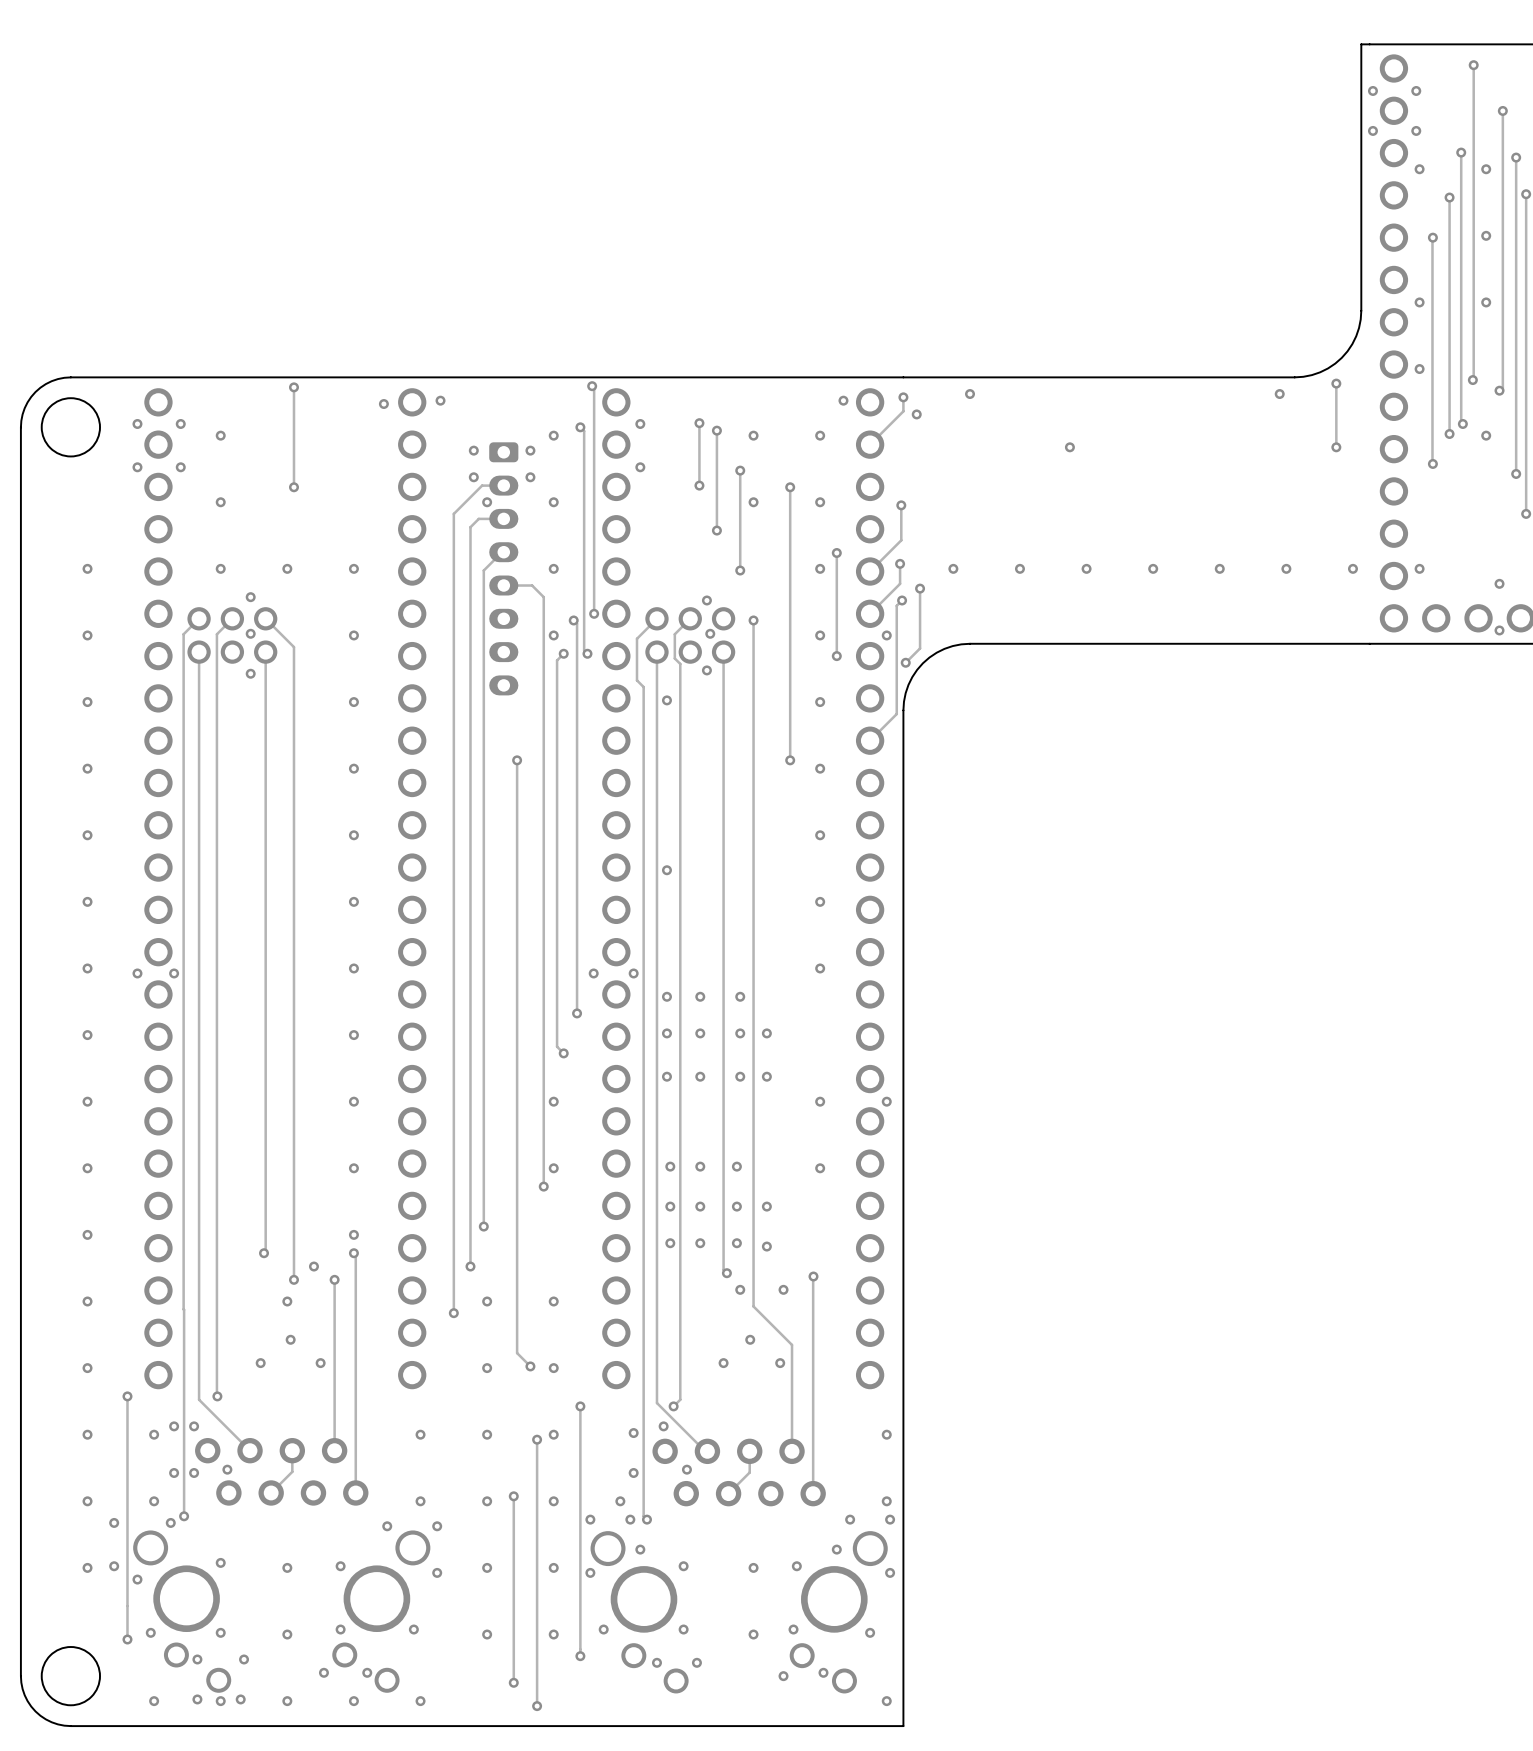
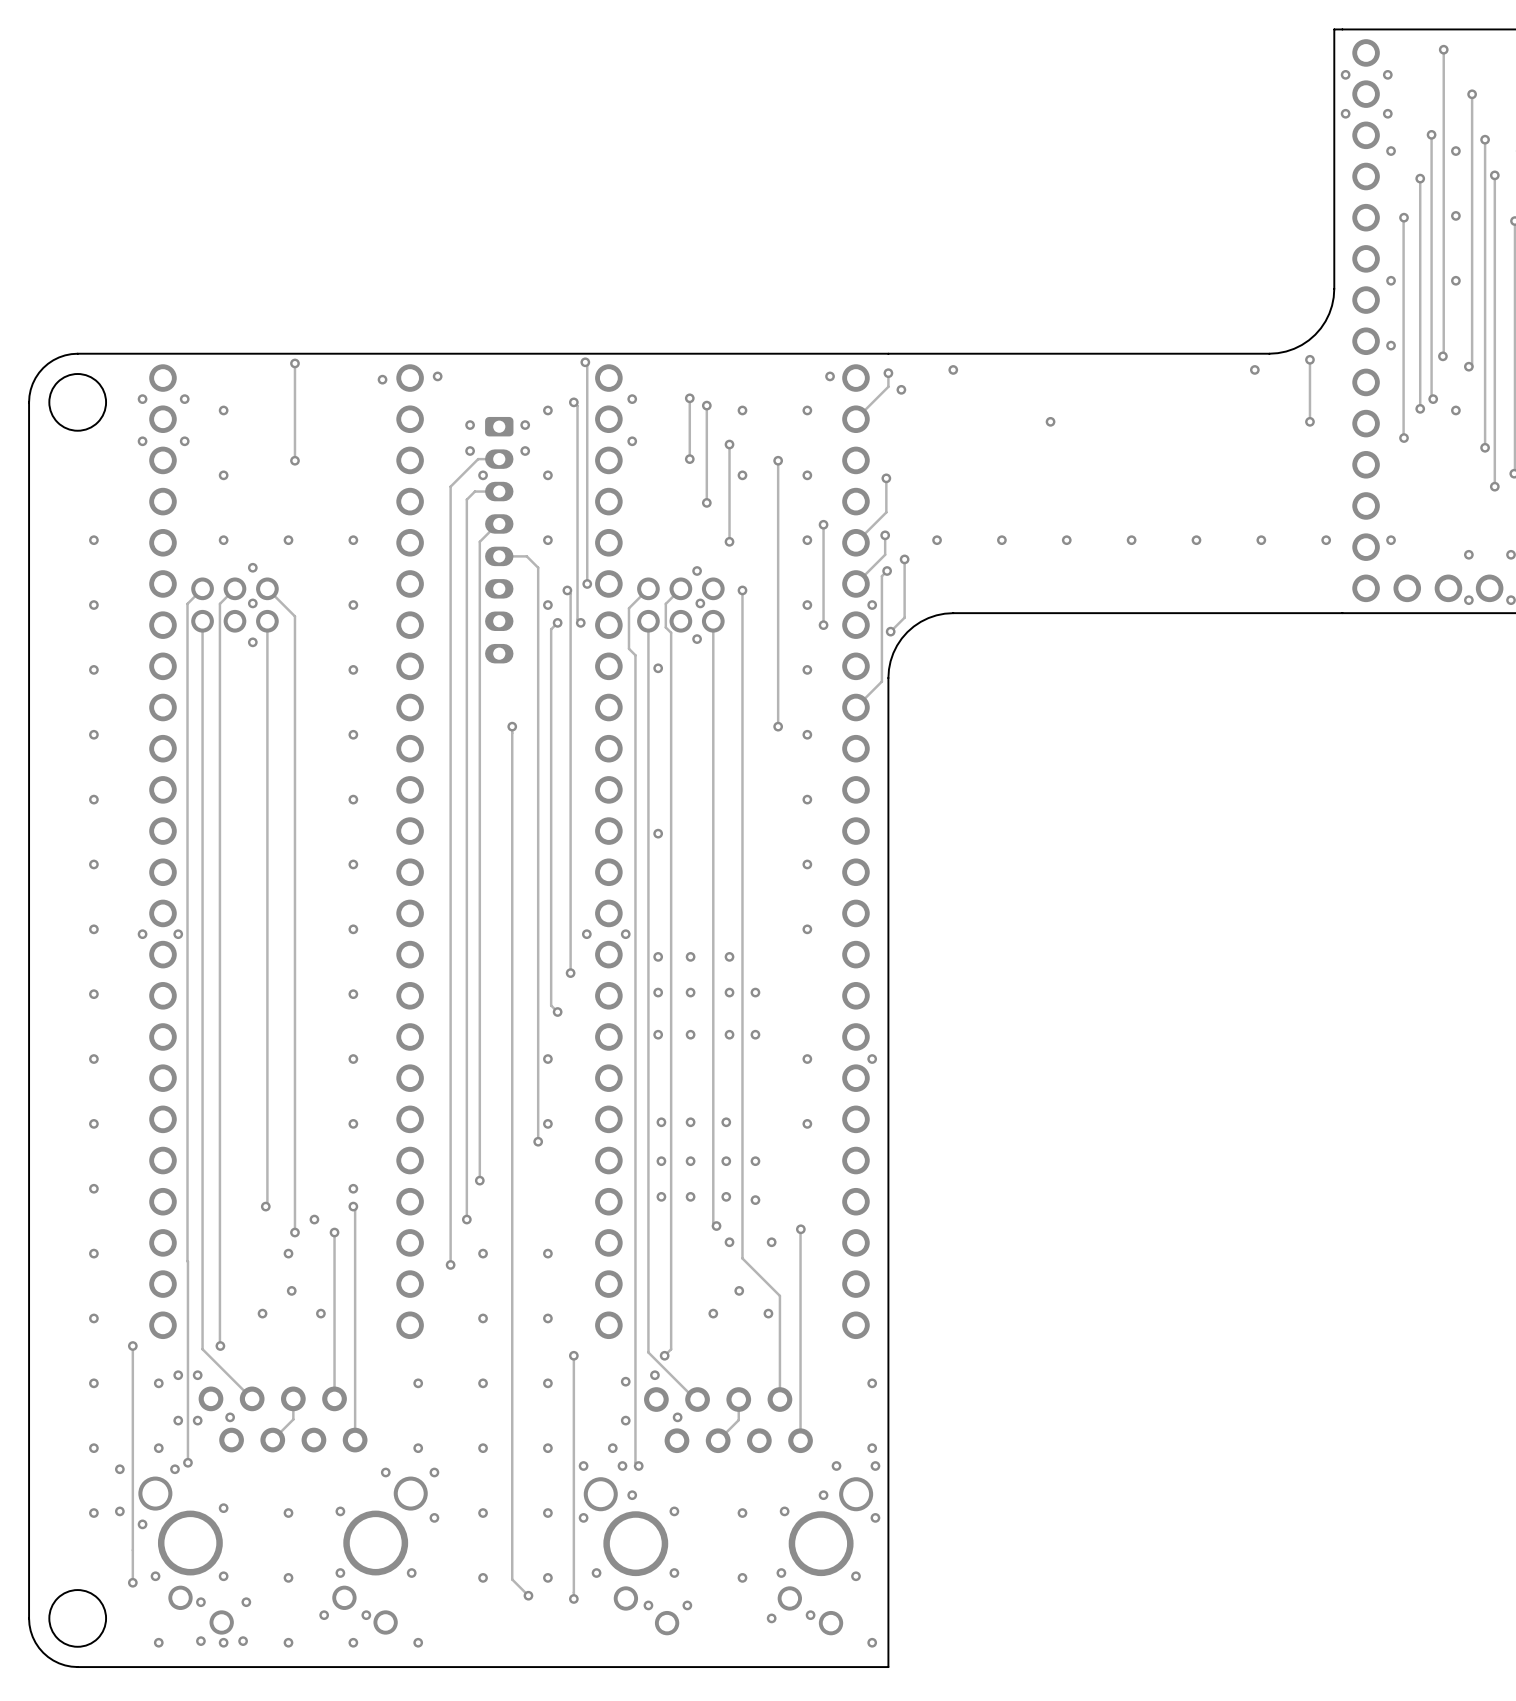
track: (517, 1353) (530, 1366) -> (512, 1303) (512, 1579) (528, 1595)
via: (530, 1366) -> none
track: (537, 1439) (537, 1706) -> none
via: (537, 1439) -> none
track: (513, 1496) (513, 1682) -> none
via: (513, 1496) -> none
via: none -> (528, 1595)
via: (513, 1682) -> none
via: (537, 1706) -> none

